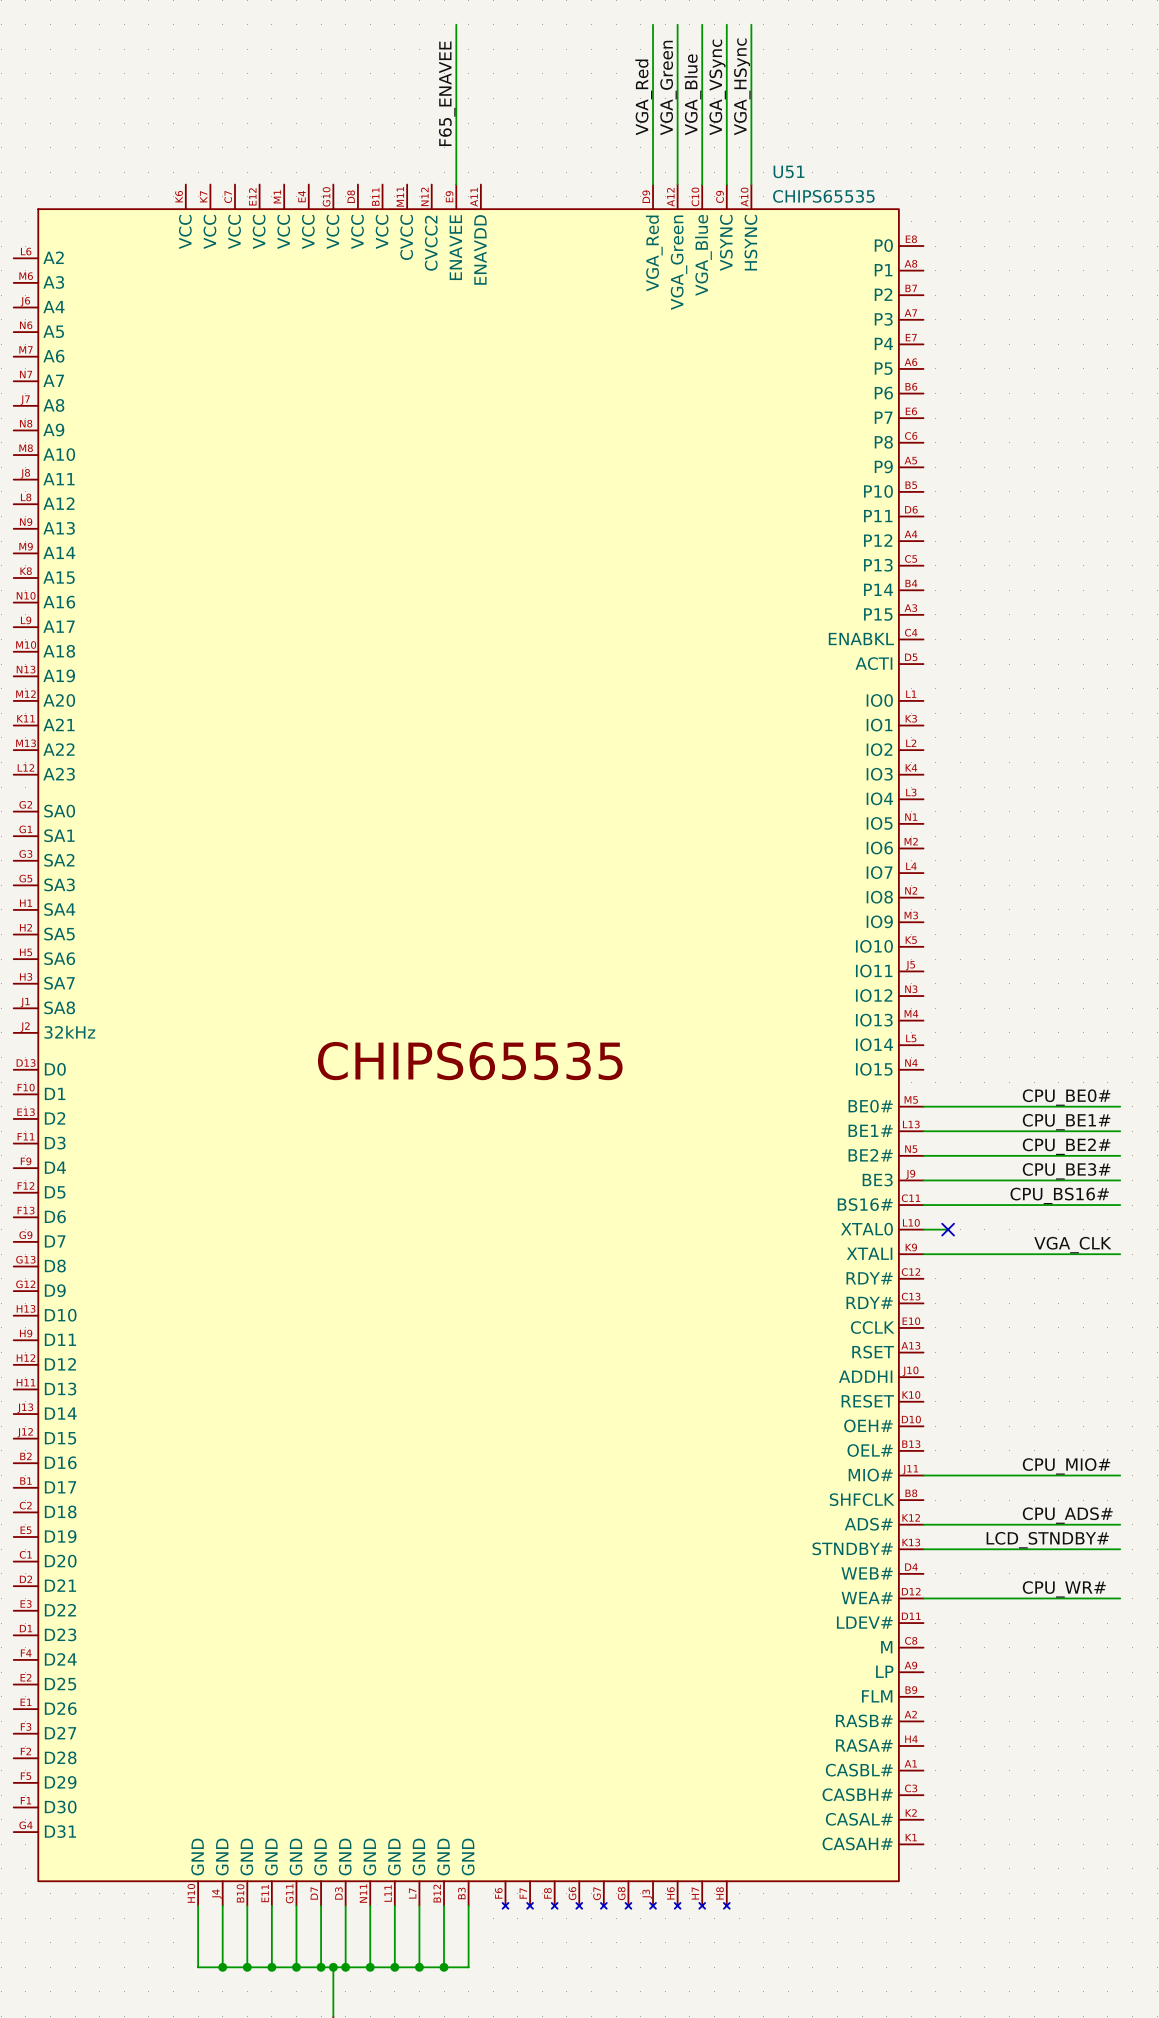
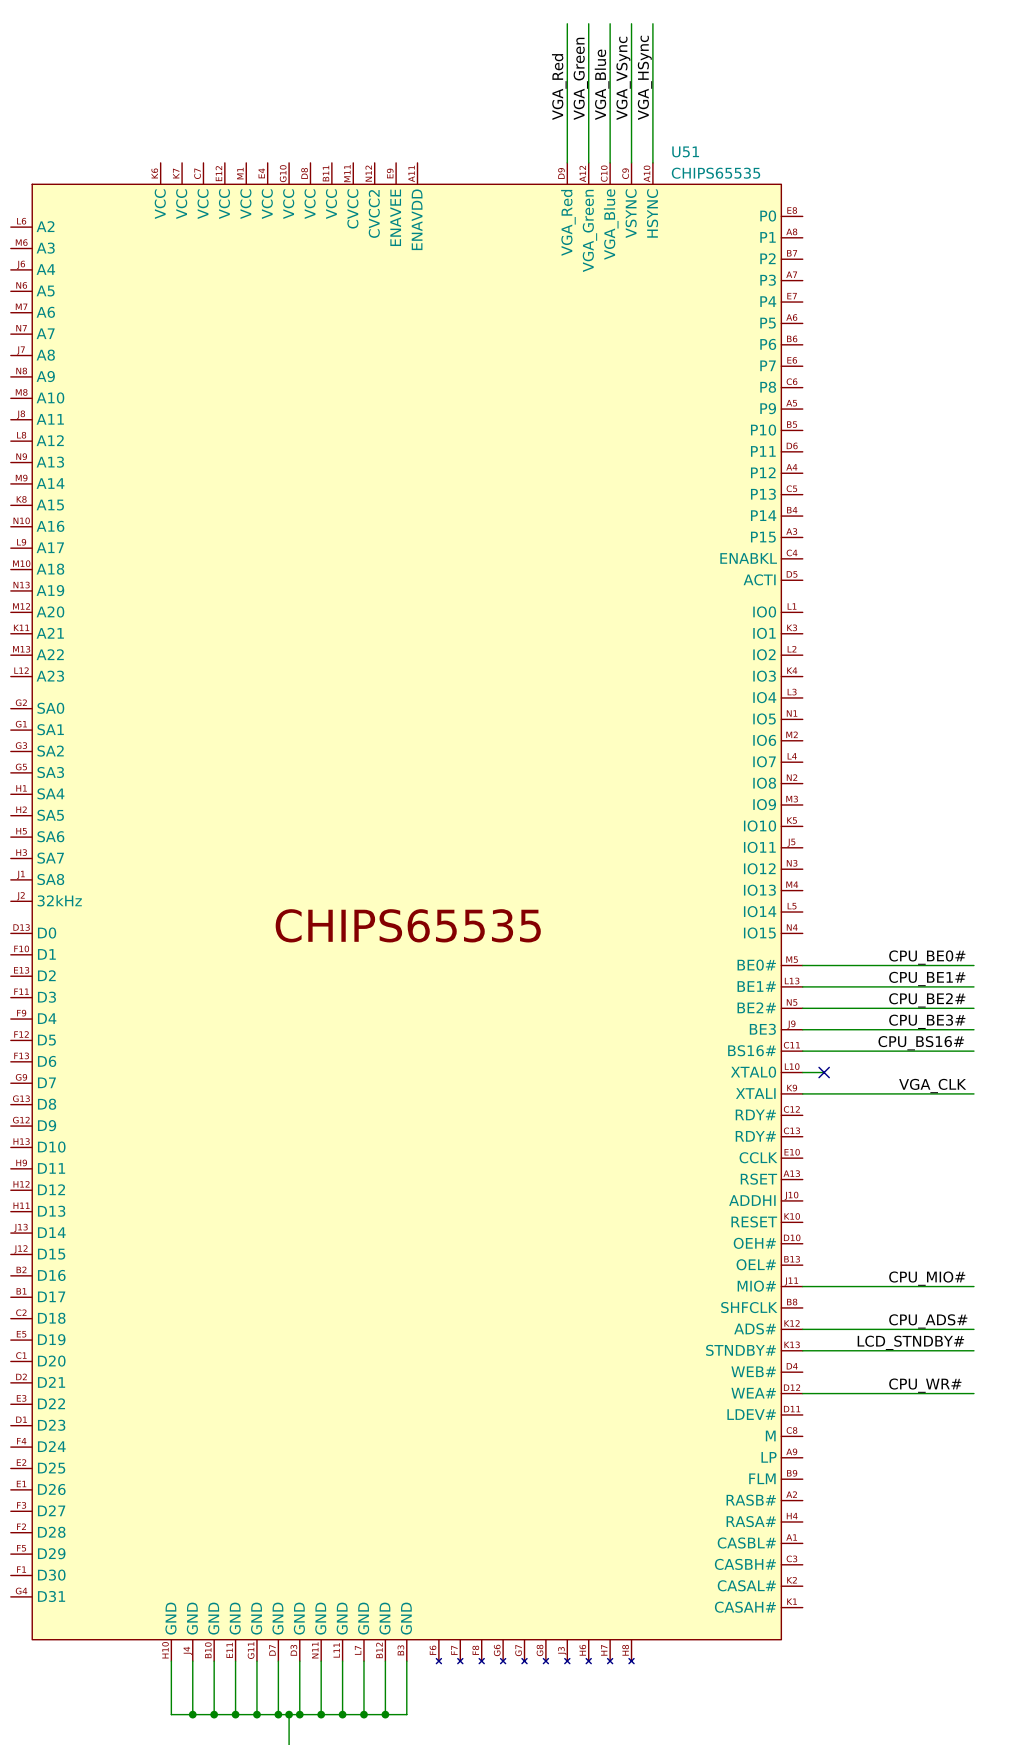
wire: (456, 24) (456, 184) -> none
label: F65_ENAVEE (447, 93) -> none

